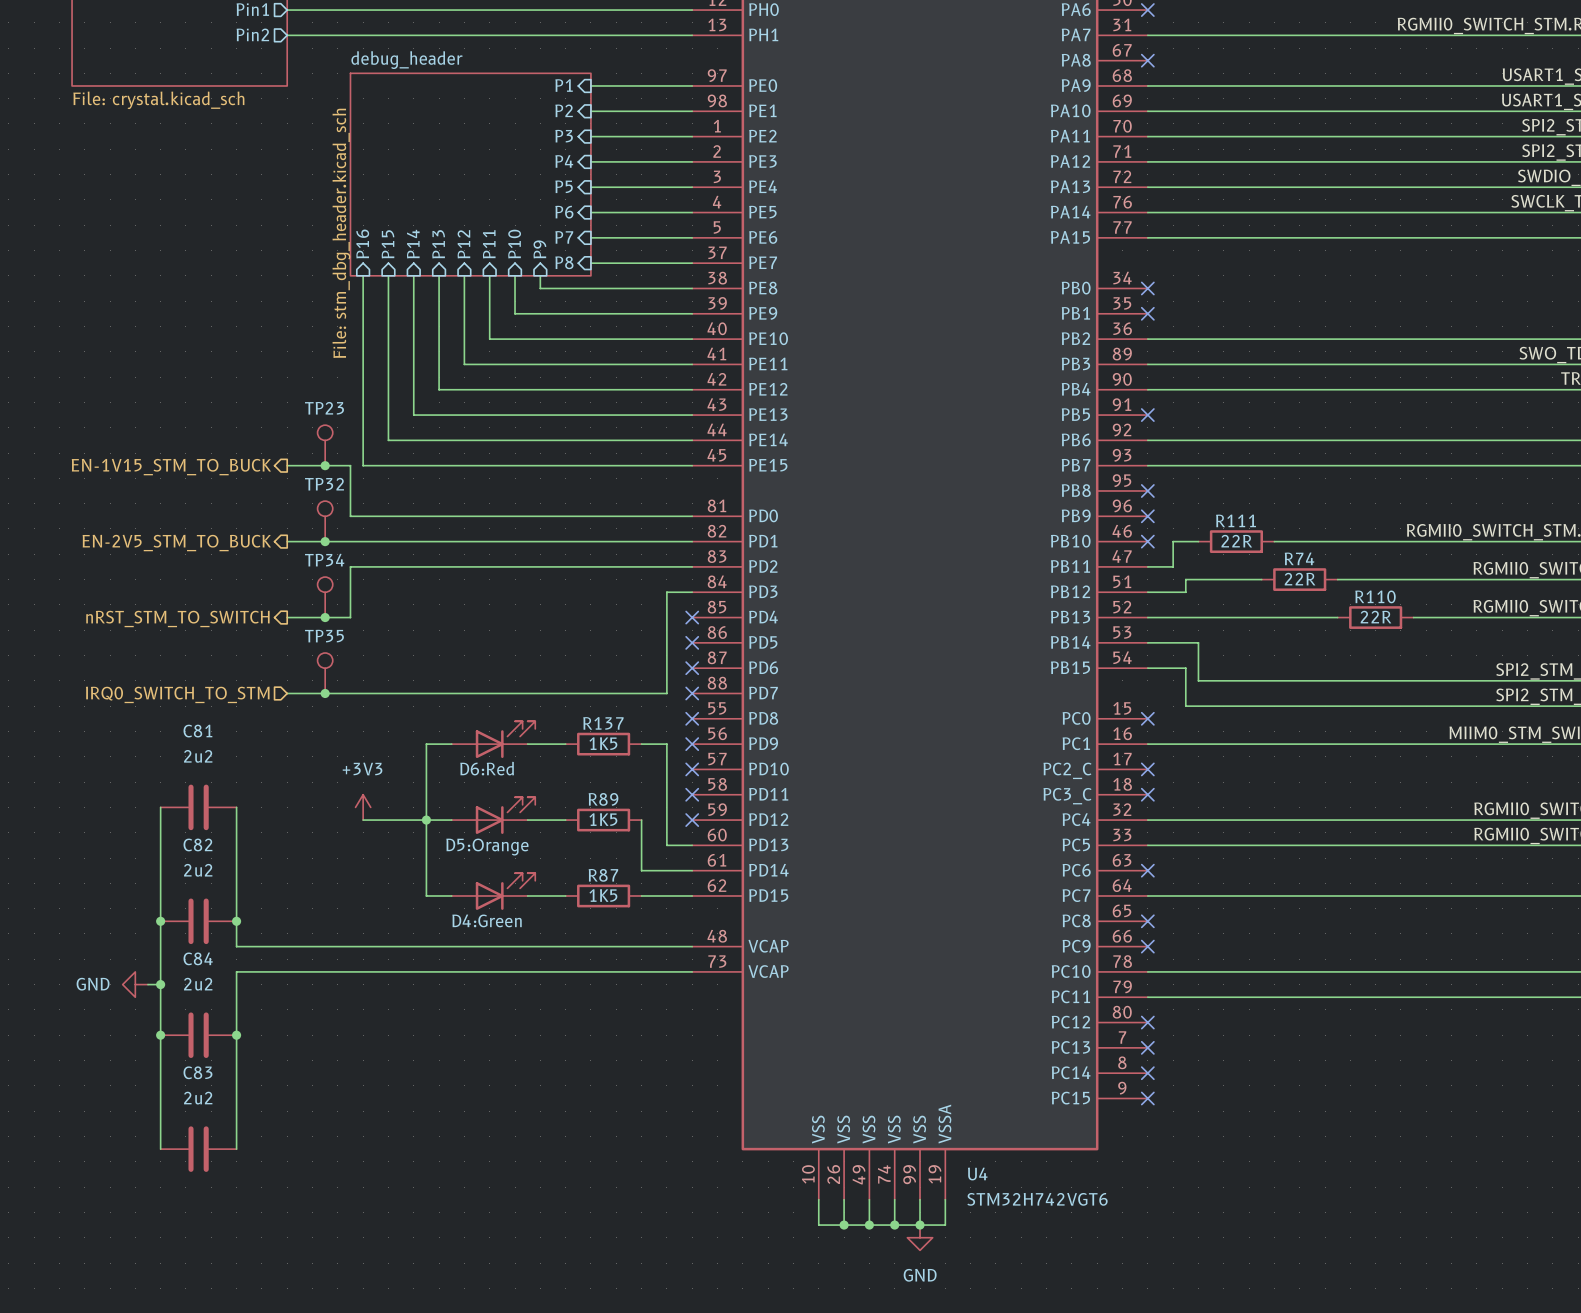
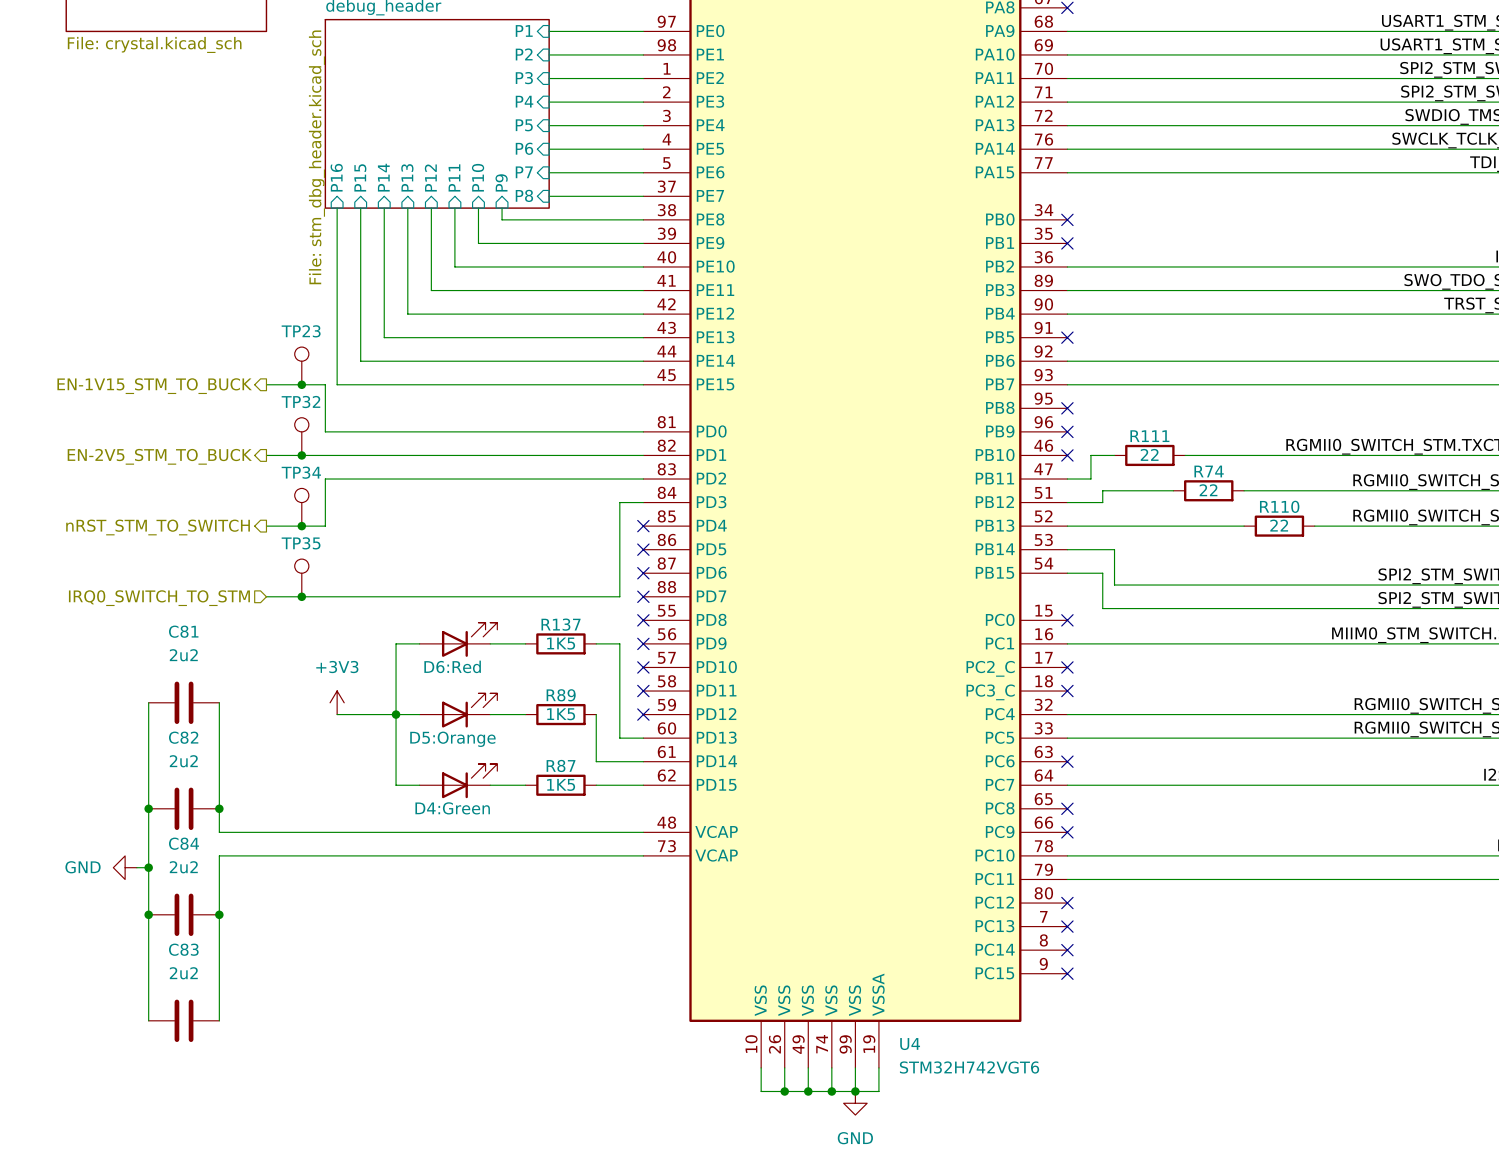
R111 value: 22R (1236, 541) -> 22 (1149, 454)
R74 value: 22R (1300, 579) -> 22 (1208, 490)
R110 value: 22R (1376, 617) -> 22 (1279, 525)

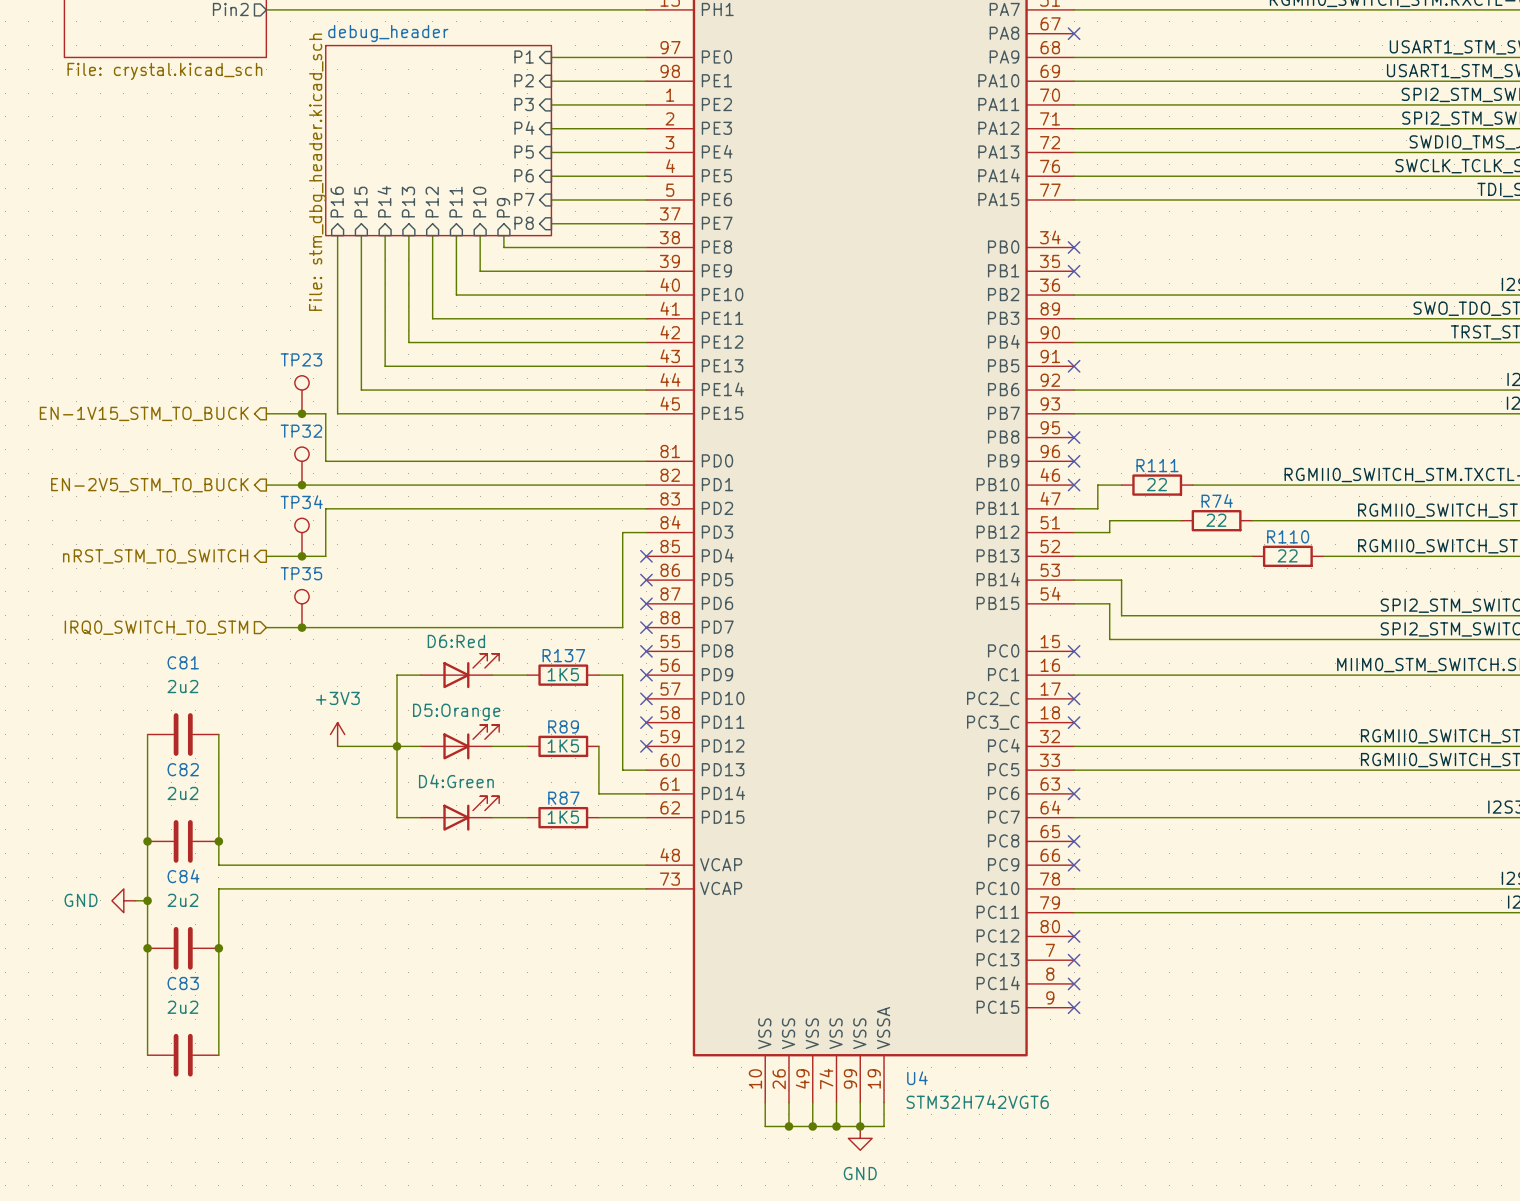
part text position: D6:Red (452, 666) -> D6:Red (456, 641)
part text position: D5:Orange (452, 739) -> D5:Orange (456, 712)
part text position: D4:Green (452, 808) -> D4:Green (456, 781)

